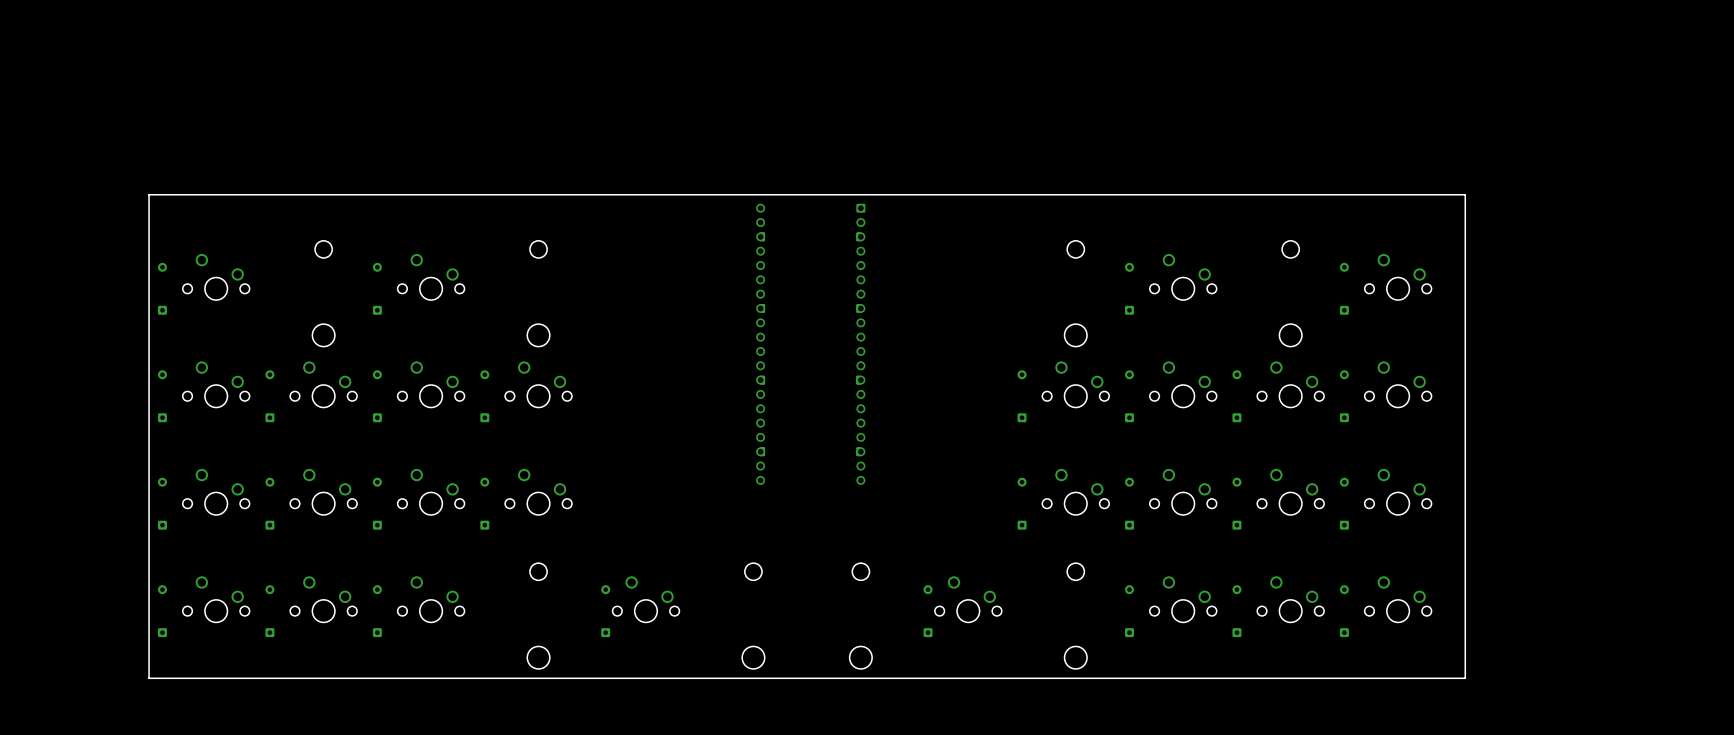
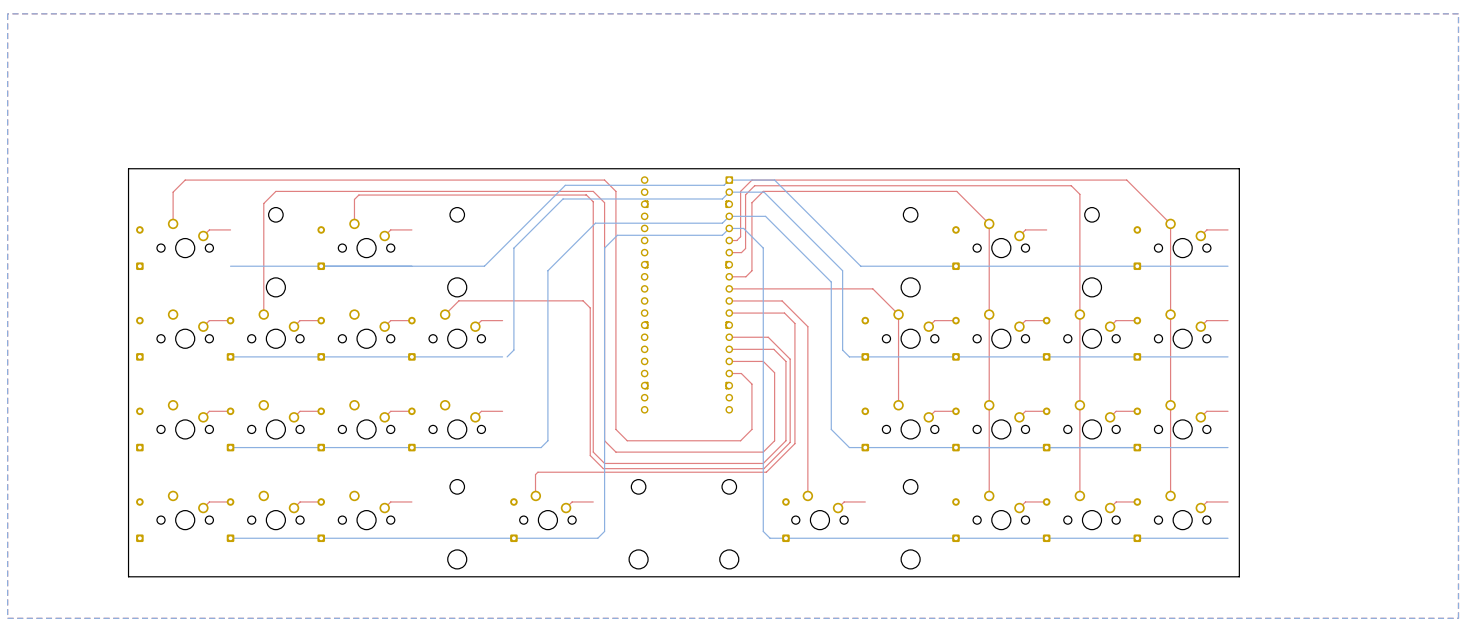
bottom zone outline: none -> (1458, 13) (7, 13) (7, 618) (1458, 618) (1458, 13)
top track: none -> (173, 223) (173, 192) (185, 180) (604, 180) (615, 191) (615, 429) (627, 440) (740, 440) (751, 429) (751, 384) (741, 373) (729, 373)
top track: none -> (354, 223) (354, 199) (358, 195) (586, 194) (593, 201) (593, 452) (604, 463) (763, 463) (785, 440) (785, 361) (773, 349) (729, 349)
top track: none -> (230, 229) (209, 229) (203, 235)
top track: none -> (411, 229) (390, 229) (384, 235)
top track: none -> (1046, 229) (1025, 229) (1019, 235)
top track: none -> (1228, 229) (1206, 229) (1201, 235)
top track: none -> (729, 240) (736, 240) (740, 236) (740, 191) (751, 180) (1126, 180) (1170, 223) (1170, 495)
top track: none -> (729, 252) (741, 252) (745, 248) (745, 194) (754, 185) (1071, 185) (1079, 194) (1079, 495)
bottom track: none -> (1228, 266) (860, 266) (774, 180) (729, 180) (724, 185) (565, 185) (484, 266) (230, 266)
top track: none -> (729, 276) (745, 276) (751, 270) (751, 202) (763, 191) (956, 191) (989, 223) (989, 495)
top track: none -> (729, 288) (872, 288) (898, 314) (898, 405)
top track: none -> (729, 300) (782, 300) (807, 326) (807, 495)
top track: none -> (729, 313) (784, 313) (794, 323) (794, 443) (766, 472) (537, 472) (535, 474) (535, 495)
top track: none -> (263, 314) (263, 203) (275, 191) (593, 191) (604, 202) (604, 440) (615, 452) (763, 452) (774, 440) (774, 372) (763, 361) (729, 361)
top track: none -> (445, 314) (458, 300) (583, 300) (590, 308) (590, 455) (603, 468) (763, 468) (790, 442) (790, 359) (768, 337) (729, 337)
top track: none -> (230, 320) (209, 320) (203, 326)
top track: none -> (321, 320) (300, 320) (294, 326)
top track: none -> (411, 320) (390, 320) (384, 326)
top track: none -> (502, 320) (481, 320) (475, 326)
top track: none -> (955, 320) (934, 320) (928, 326)
top track: none -> (1046, 320) (1025, 320) (1019, 326)
top track: none -> (1137, 320) (1116, 320) (1110, 326)
top track: none -> (1228, 320) (1206, 320) (1200, 326)
bottom track: none -> (502, 356) (230, 356)
bottom track: none -> (1228, 356) (849, 356) (842, 350) (842, 270) (764, 192) (729, 192) (722, 198) (563, 198) (513, 248) (513, 350) (507, 356)
top track: none -> (230, 411) (209, 411) (203, 417)
top track: none -> (321, 411) (300, 411) (294, 417)
top track: none -> (411, 411) (390, 411) (384, 417)
top track: none -> (502, 411) (481, 411) (475, 417)
top track: none -> (955, 411) (934, 411) (928, 417)
top track: none -> (1046, 411) (1025, 411) (1019, 417)
top track: none -> (1137, 411) (1116, 411) (1110, 417)
top track: none -> (1228, 411) (1206, 411) (1200, 417)
bottom track: none -> (1228, 447) (849, 447) (831, 429) (831, 282) (765, 216) (729, 216) (722, 223) (595, 223) (547, 270) (547, 440) (541, 447) (230, 447)
top track: none -> (230, 501) (209, 501) (203, 508)
top track: none -> (321, 501) (300, 501) (294, 508)
top track: none -> (411, 501) (390, 501) (384, 508)
top track: none -> (593, 501) (572, 501) (566, 508)
top track: none -> (865, 501) (844, 501) (838, 508)
top track: none -> (1046, 501) (1025, 501) (1019, 508)
top track: none -> (1137, 501) (1116, 501) (1110, 508)
top track: none -> (1228, 501) (1206, 501) (1200, 508)
bottom track: none -> (1228, 538) (770, 538) (763, 531) (763, 248) (743, 228) (729, 228) (722, 235) (617, 235) (604, 248) (604, 531) (597, 538) (230, 538)

